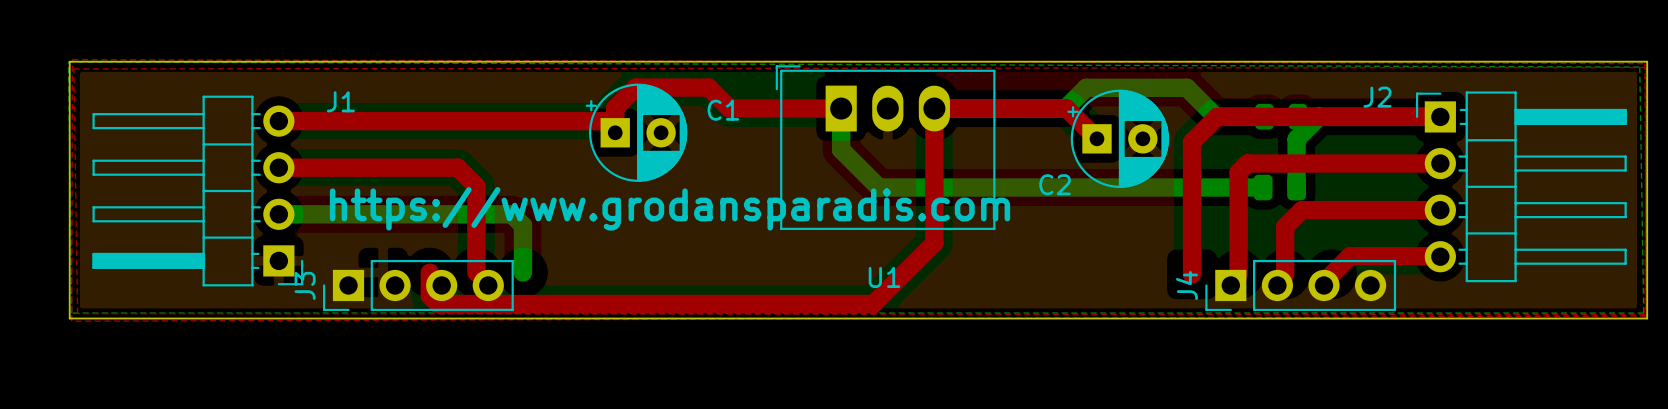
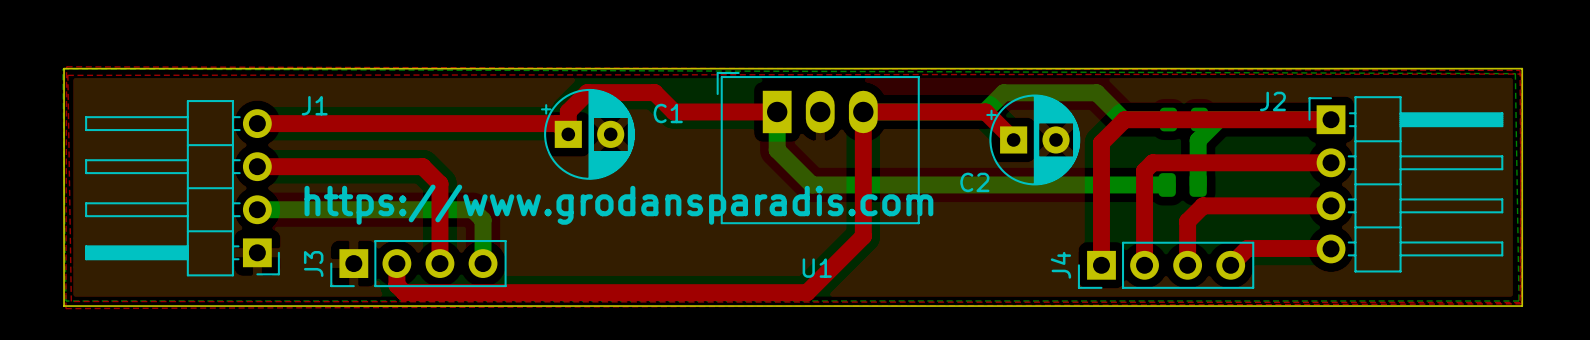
J3 position: (418, 285) -> (418, 263)
J4 position: (1300, 285) -> (1166, 265)

